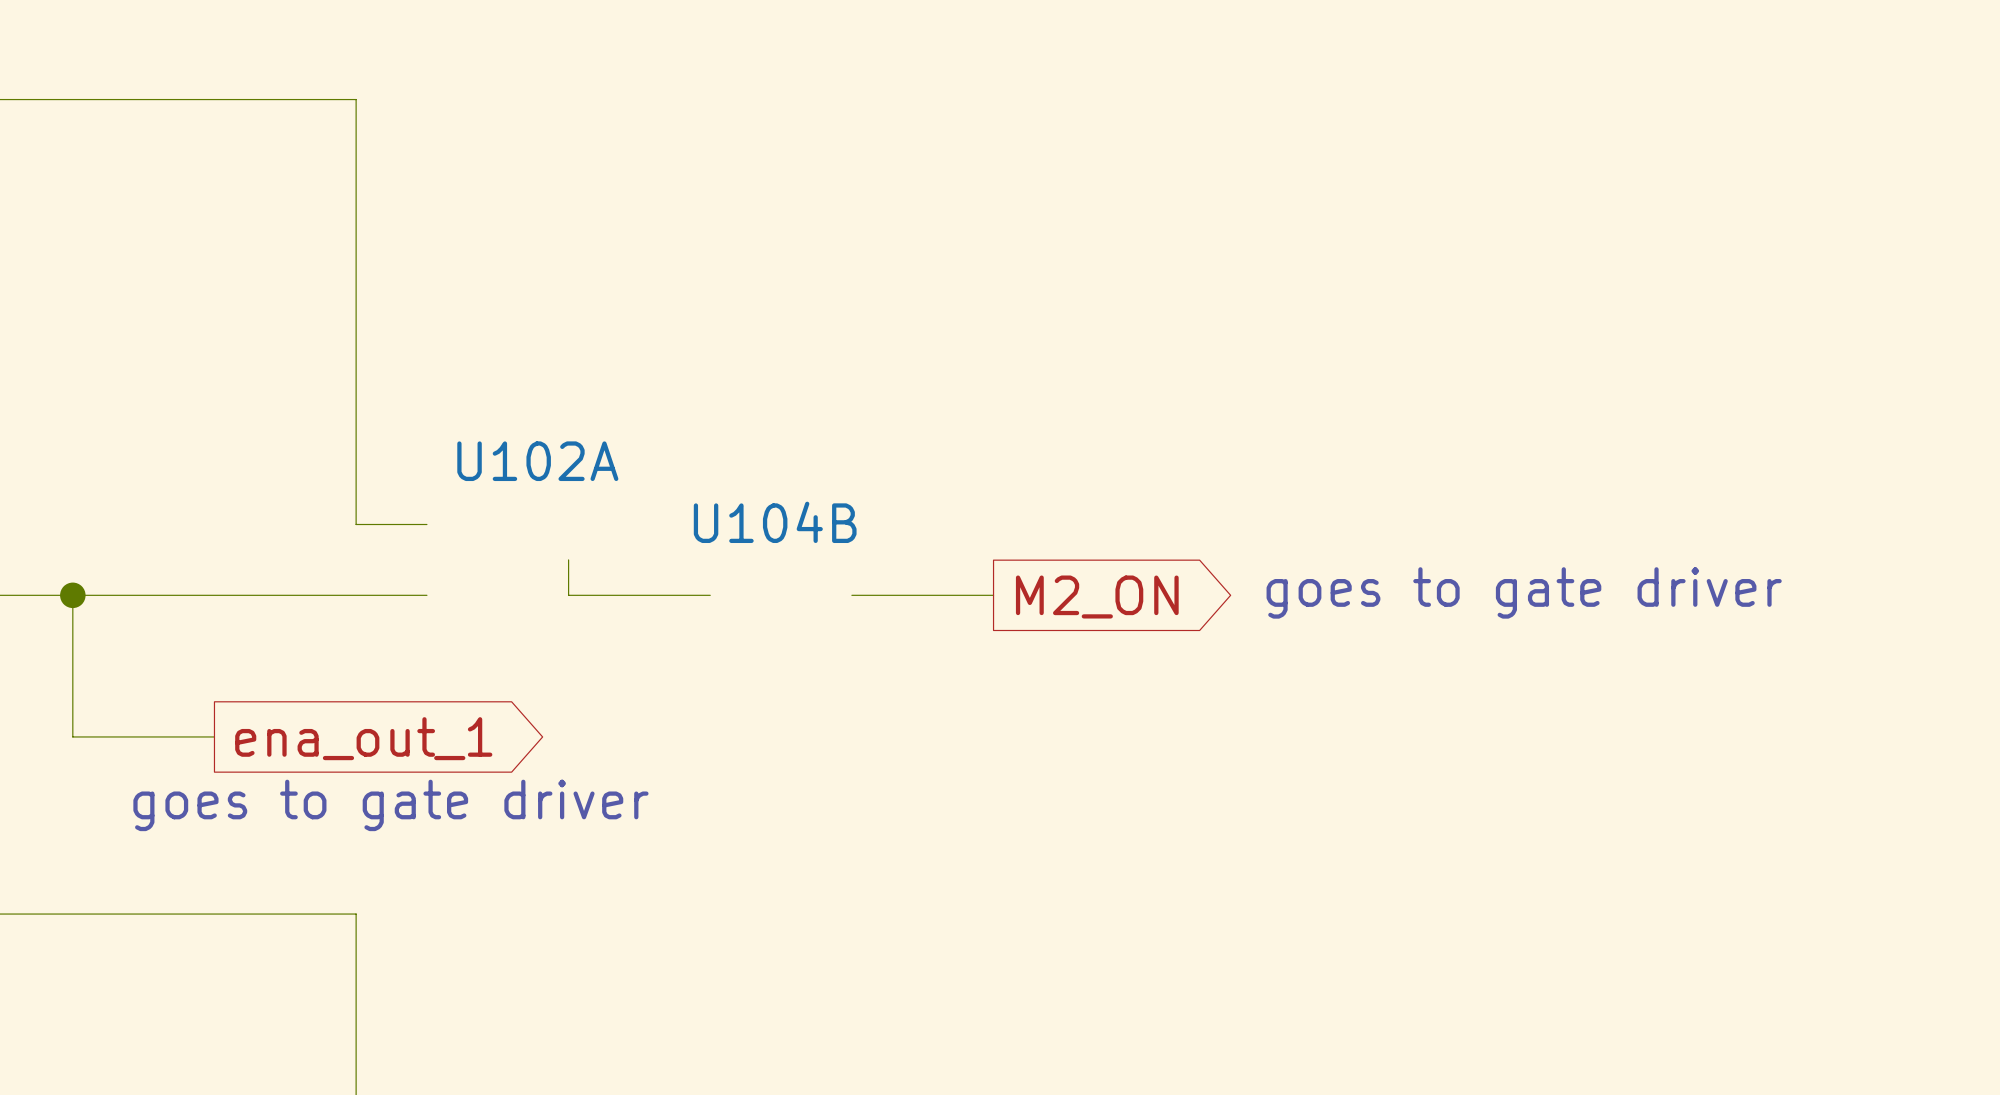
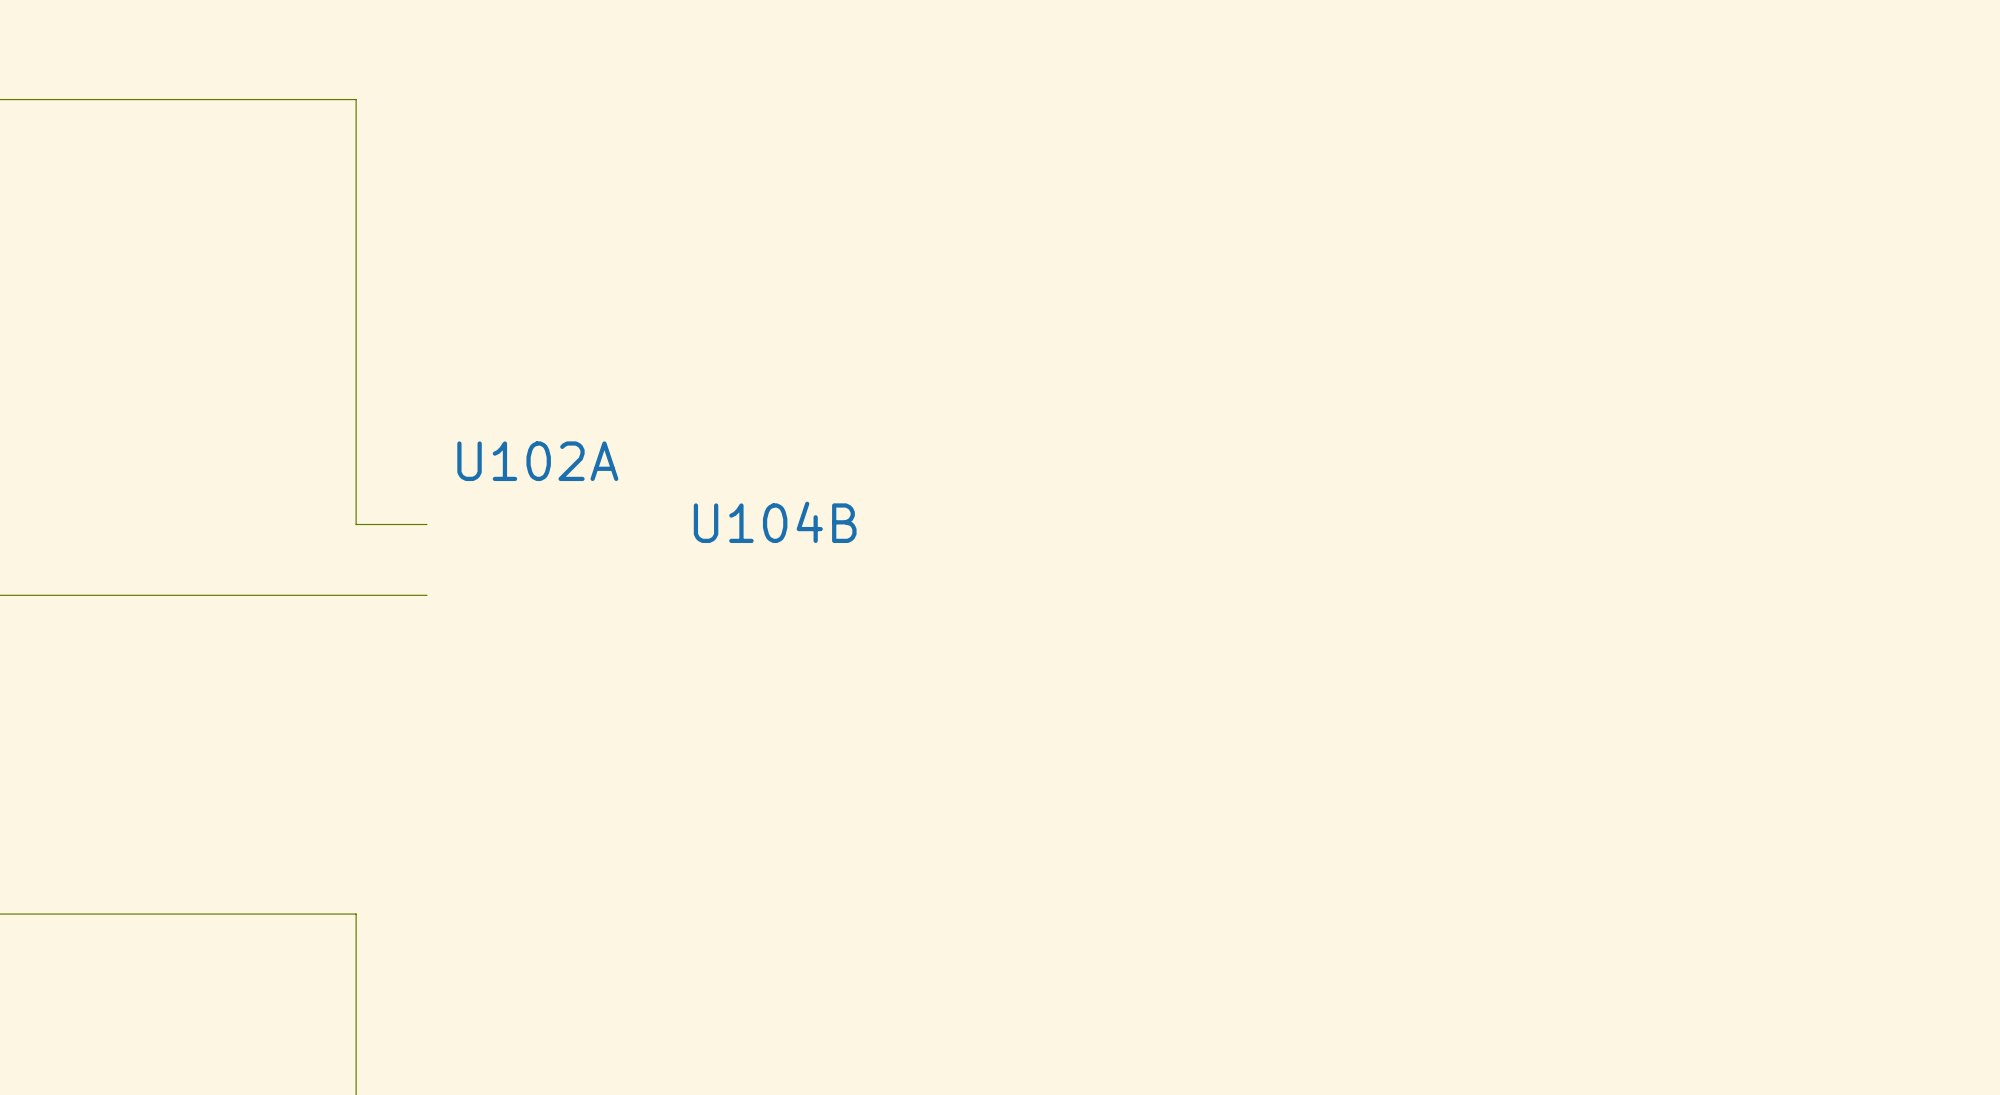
wire: (568, 559) (568, 595) (710, 595) -> none
text: goes to gate driver (1524, 592) -> none
wire: (72, 595) (72, 736) (214, 736) -> none
junction: (72, 595) -> none
wire: (851, 595) (993, 595) -> none
global label: M2_ON (1097, 597) -> none
global label: ena_out_1 (363, 738) -> none
text: goes to gate driver (390, 805) -> none

